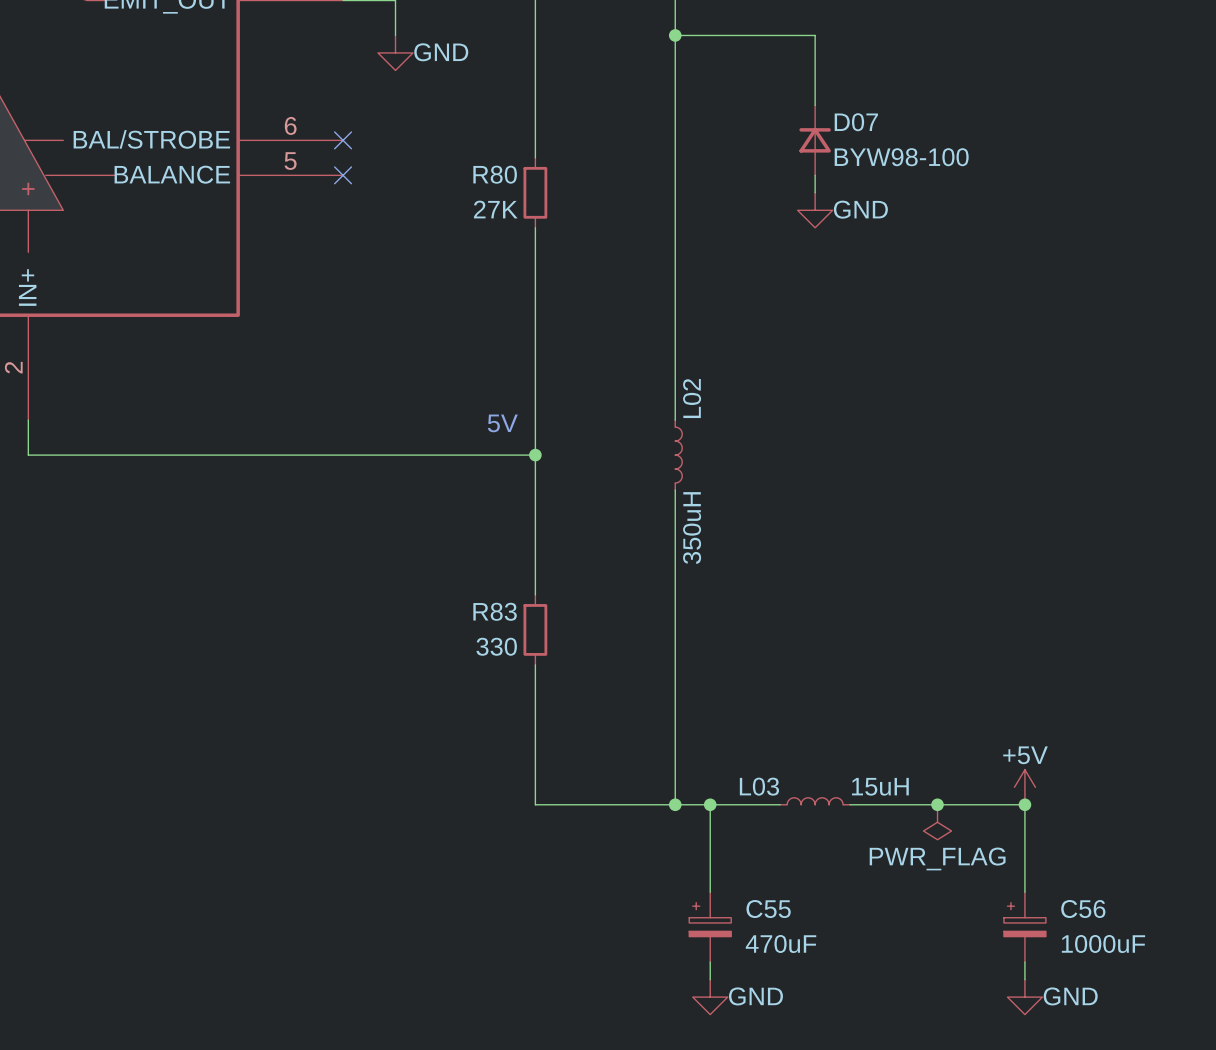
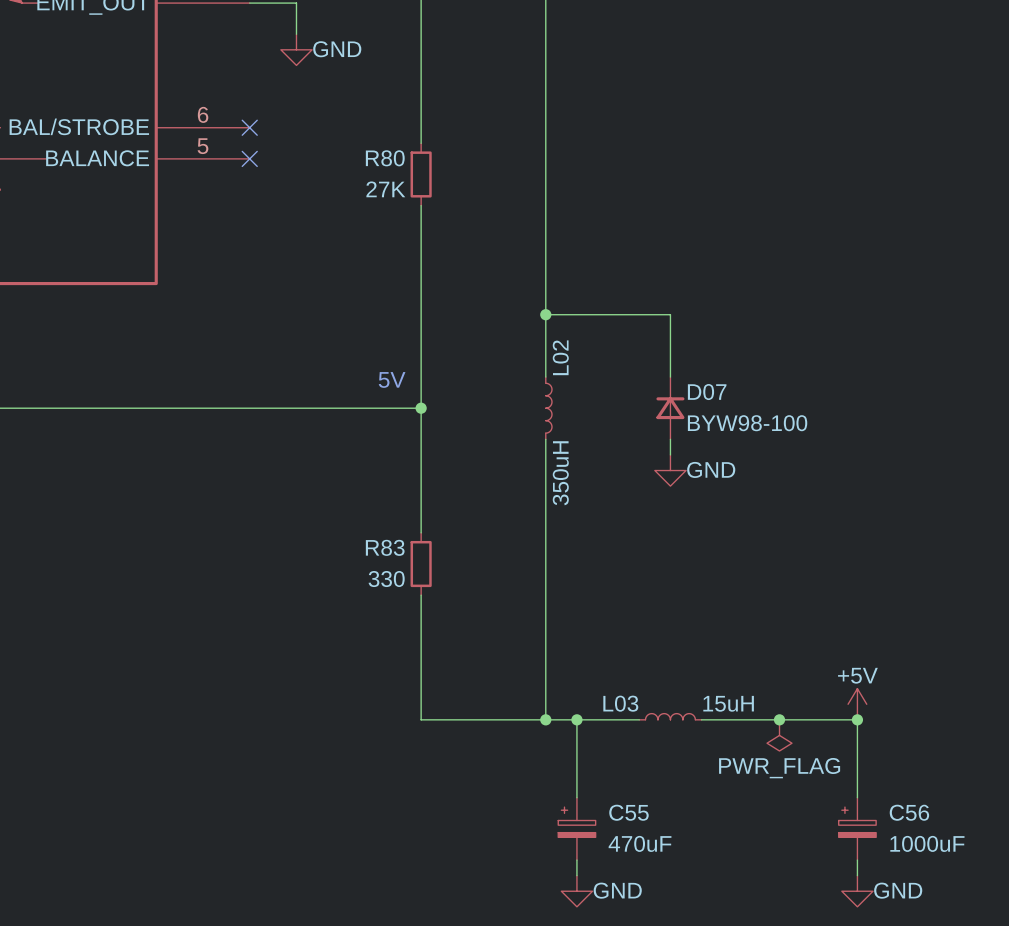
wire: (675, 35) (815, 35) (815, 105) -> (545, 314) (670, 314) (670, 377)
junction: (675, 35) -> none
D07 position: (815, 140) -> (670, 408)
wire: (815, 175) (815, 192) -> (670, 439) (670, 454)
power symbol position: GND (815, 210) -> GND (670, 470)
junction: none -> (545, 314)

